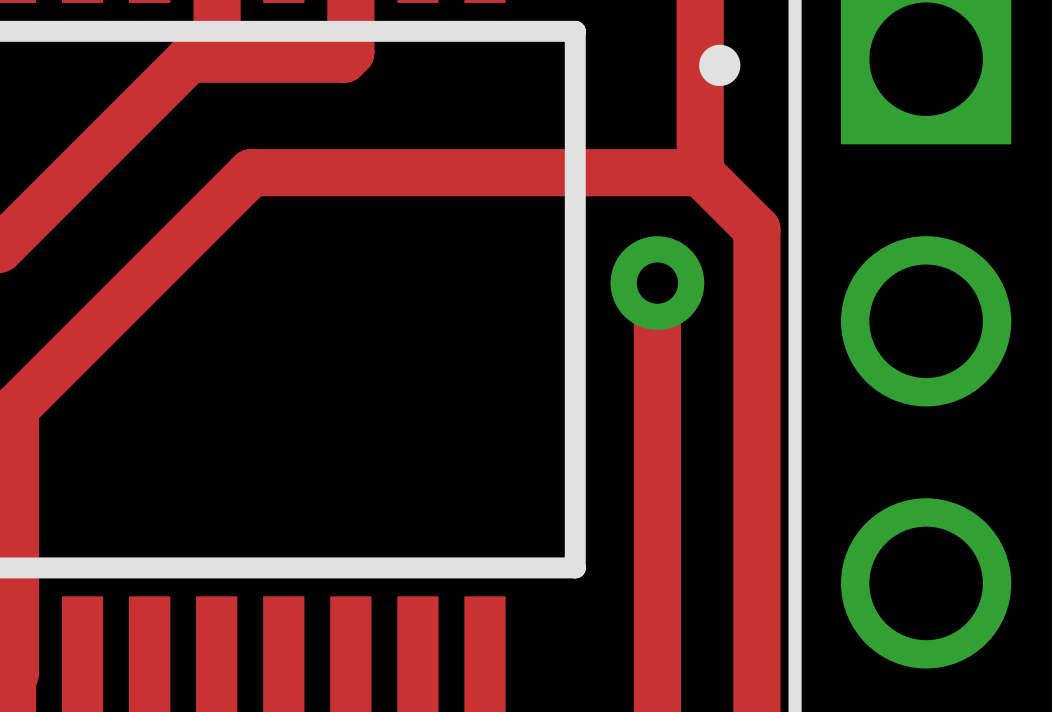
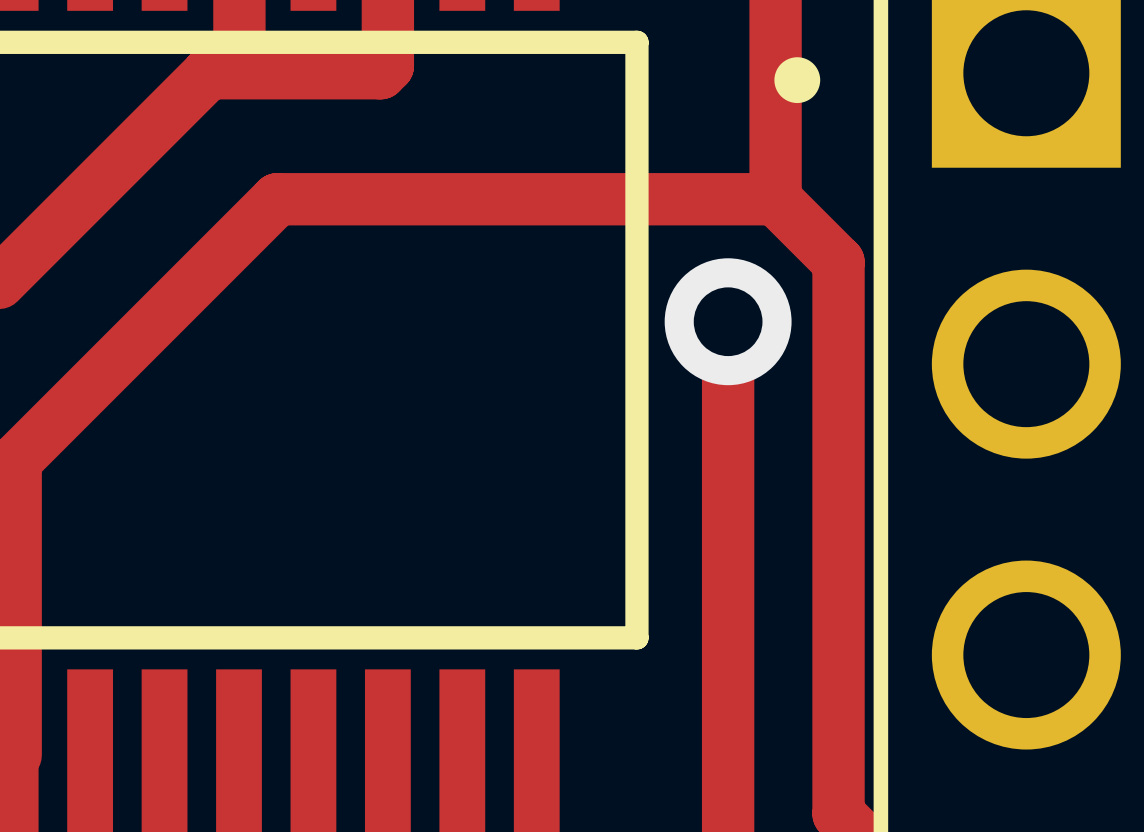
via size: [610, 236, 705, 330] -> [664, 258, 792, 386]

